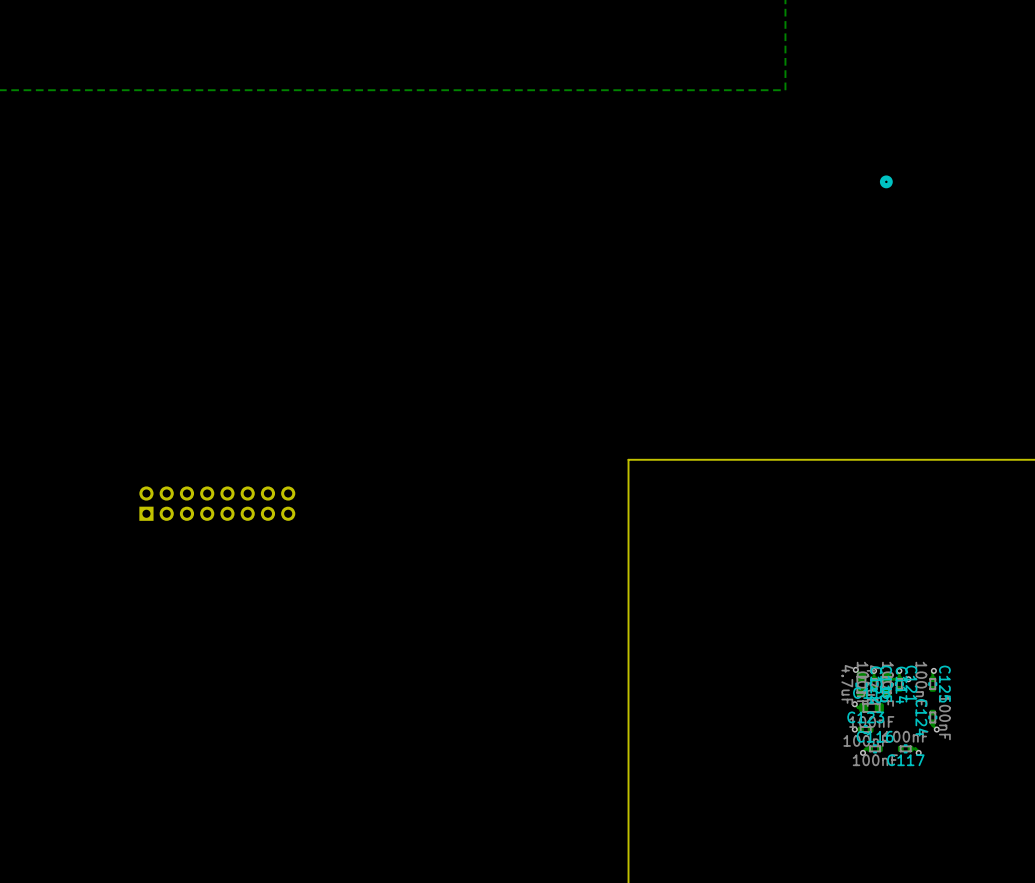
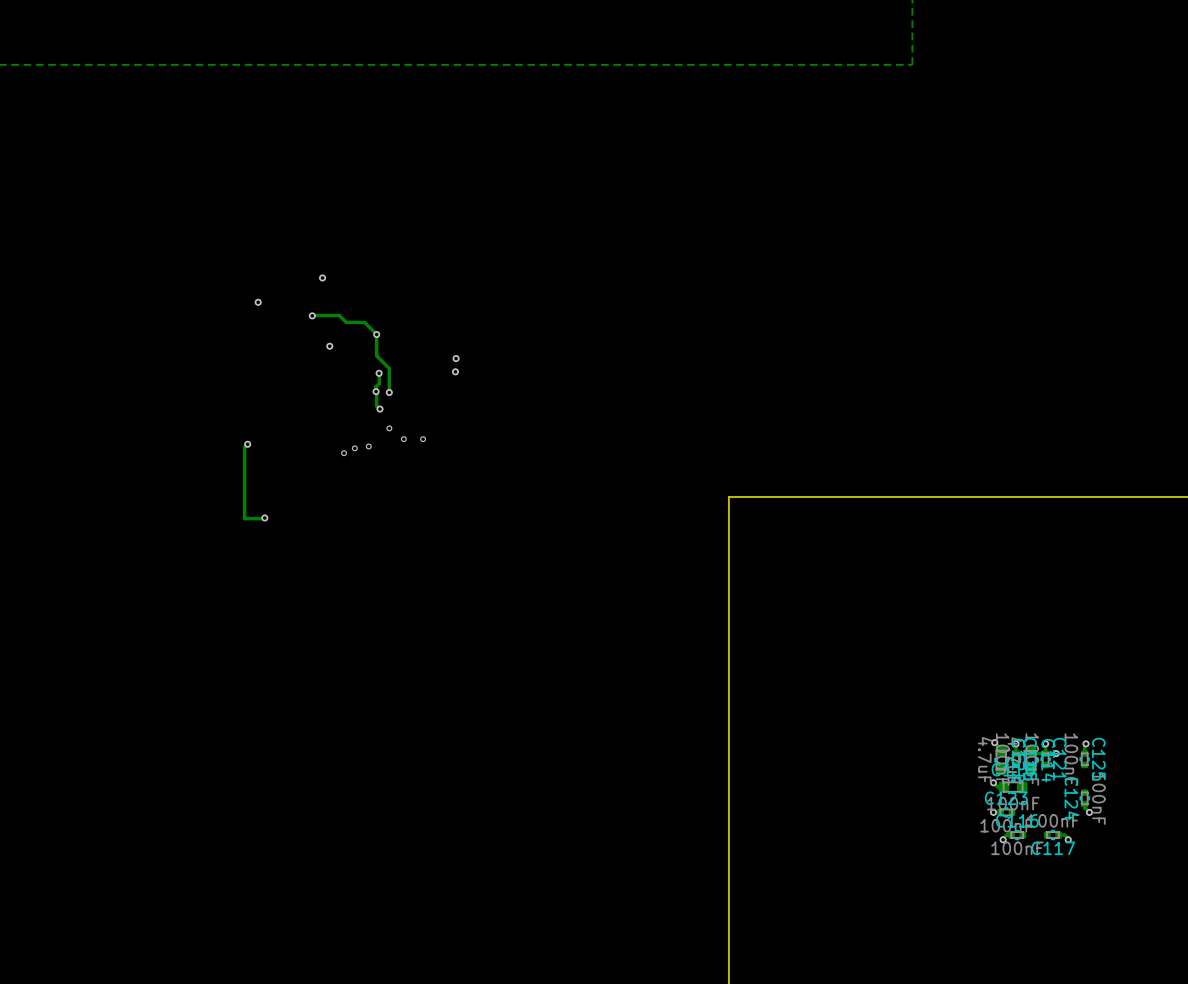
part: (886, 181) -> none
via: none -> (322, 277)
via: none -> (258, 302)
track: none -> (312, 315) (339, 315) (346, 322) (364, 322) (376, 334) (376, 355) (389, 368) (389, 392)
via: none -> (312, 315)
via: none -> (376, 334)
via: none -> (329, 346)
via: none -> (456, 358)
via: none -> (455, 371)
track: none -> (379, 373) (379, 383) (376, 386) (376, 391) (376, 406) (379, 409)
via: none -> (379, 373)
via: none -> (376, 391)
via: none -> (389, 392)
via: none -> (379, 409)
via: none -> (389, 428)
via: none -> (403, 439)
via: none -> (423, 439)
track: none -> (247, 444) (244, 447) (244, 518) (264, 517)
via: none -> (247, 444)
via: none -> (368, 446)
via: none -> (354, 448)
via: none -> (344, 453)
via: none -> (264, 517)
part: (217, 503) -> none

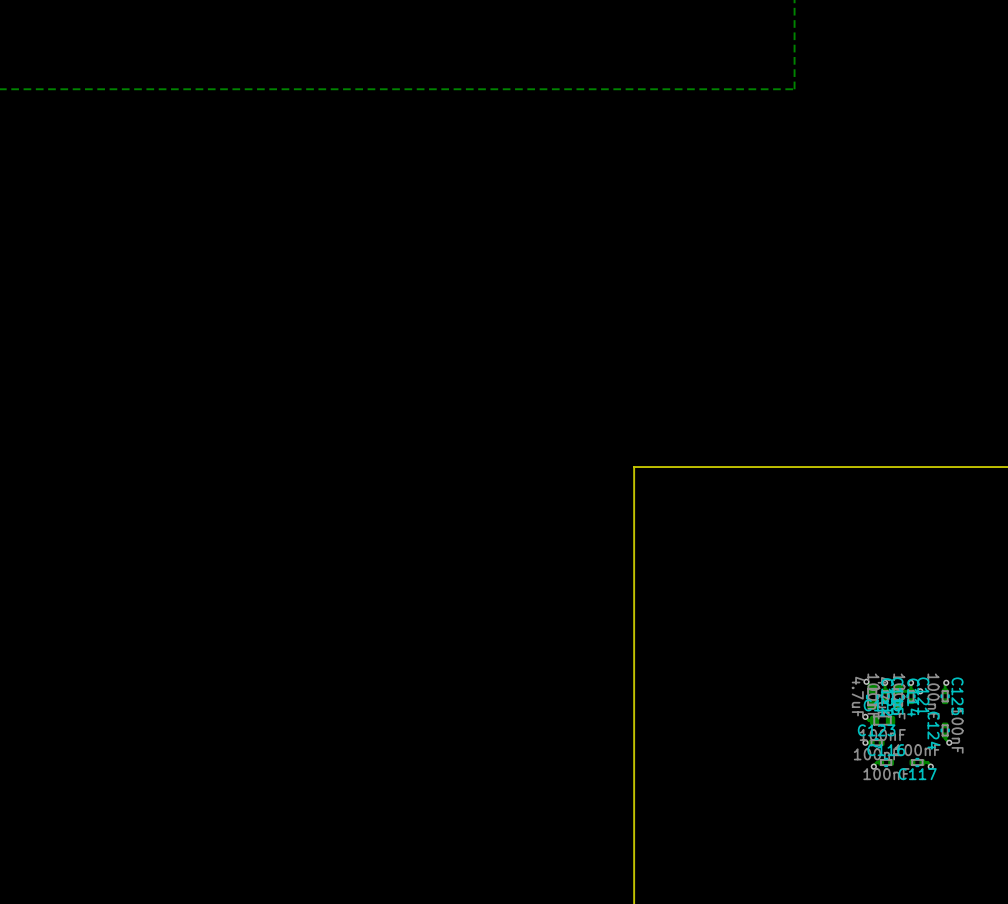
via: (322, 277) -> none
via: (258, 302) -> none
track: (312, 315) (339, 315) (346, 322) (364, 322) (376, 334) (376, 355) (389, 368) (389, 392) -> none
via: (312, 315) -> none
via: (376, 334) -> none
via: (329, 346) -> none
via: (456, 358) -> none
via: (455, 371) -> none
track: (379, 373) (379, 383) (376, 386) (376, 391) (376, 406) (379, 409) -> none
via: (379, 373) -> none
via: (376, 391) -> none
via: (389, 392) -> none
via: (379, 409) -> none
via: (389, 428) -> none
via: (403, 439) -> none
via: (423, 439) -> none
track: (247, 444) (244, 447) (244, 518) (264, 517) -> none
via: (247, 444) -> none
via: (368, 446) -> none
via: (354, 448) -> none
via: (344, 453) -> none
via: (264, 517) -> none

